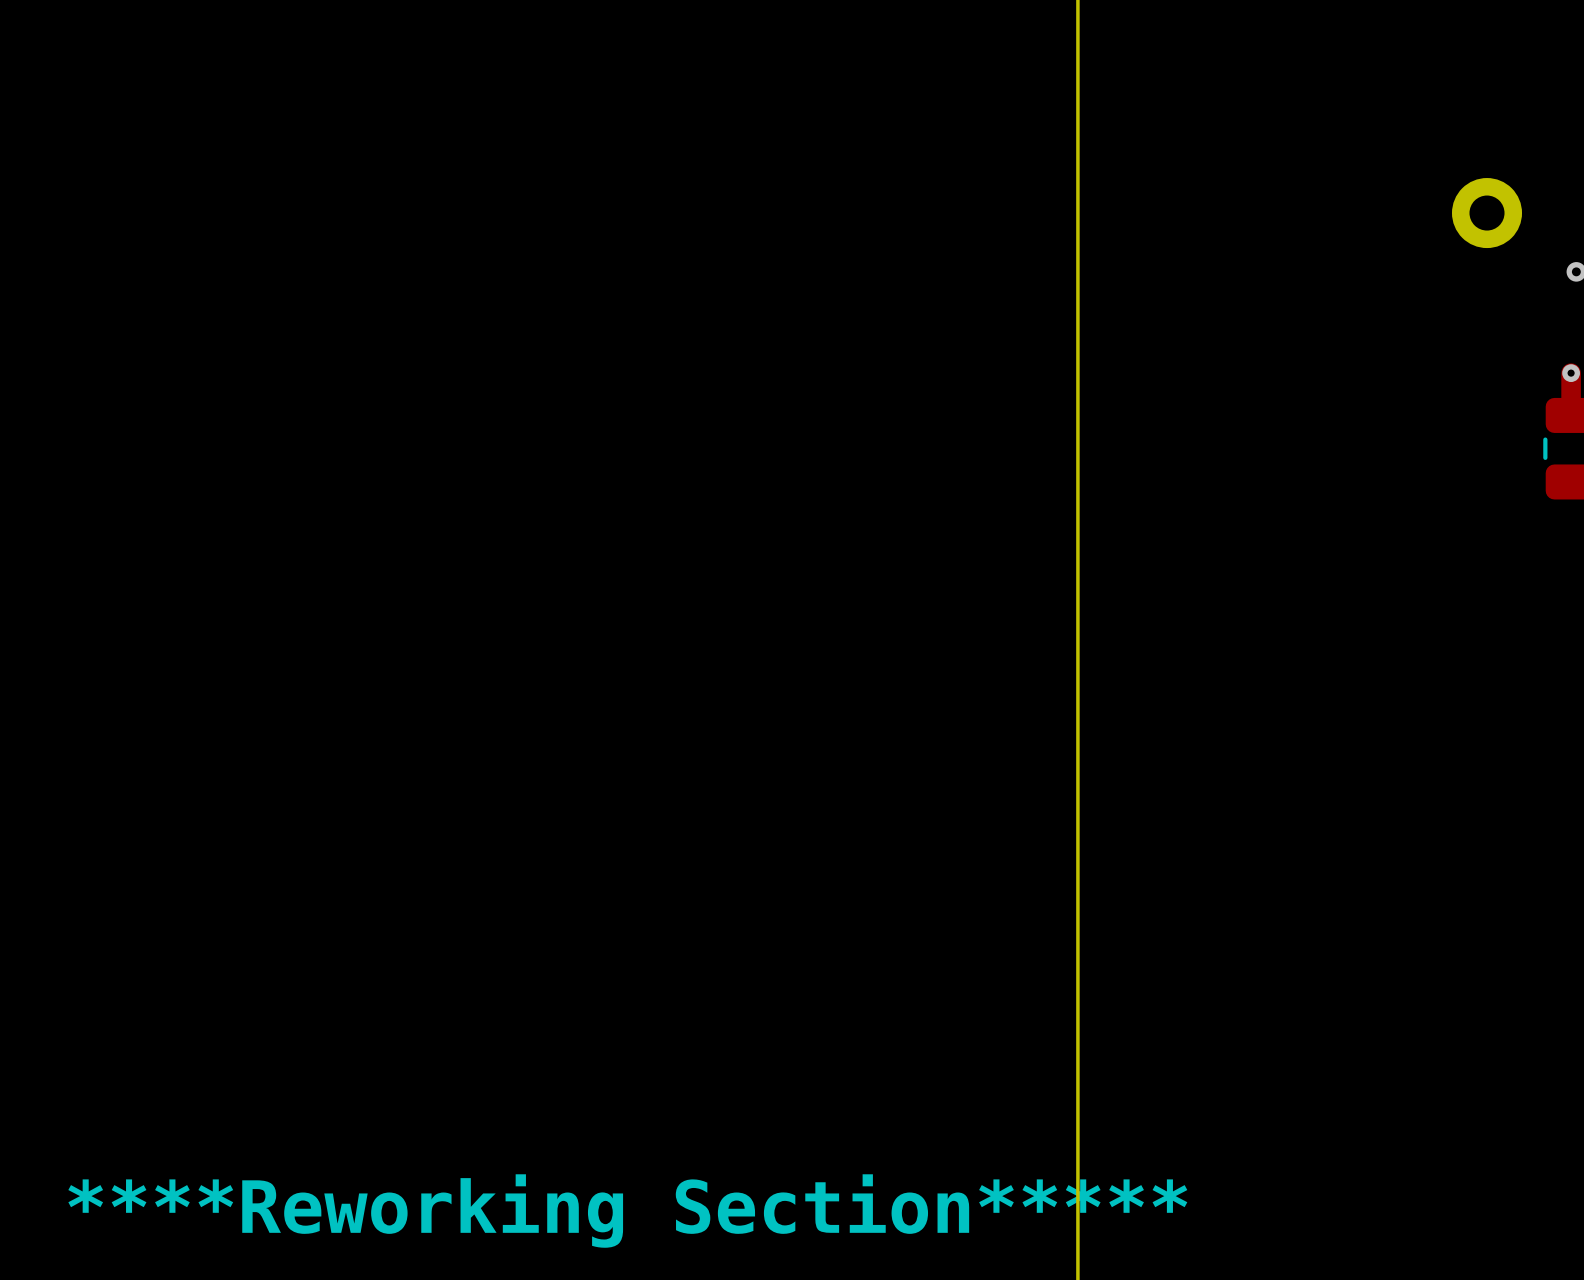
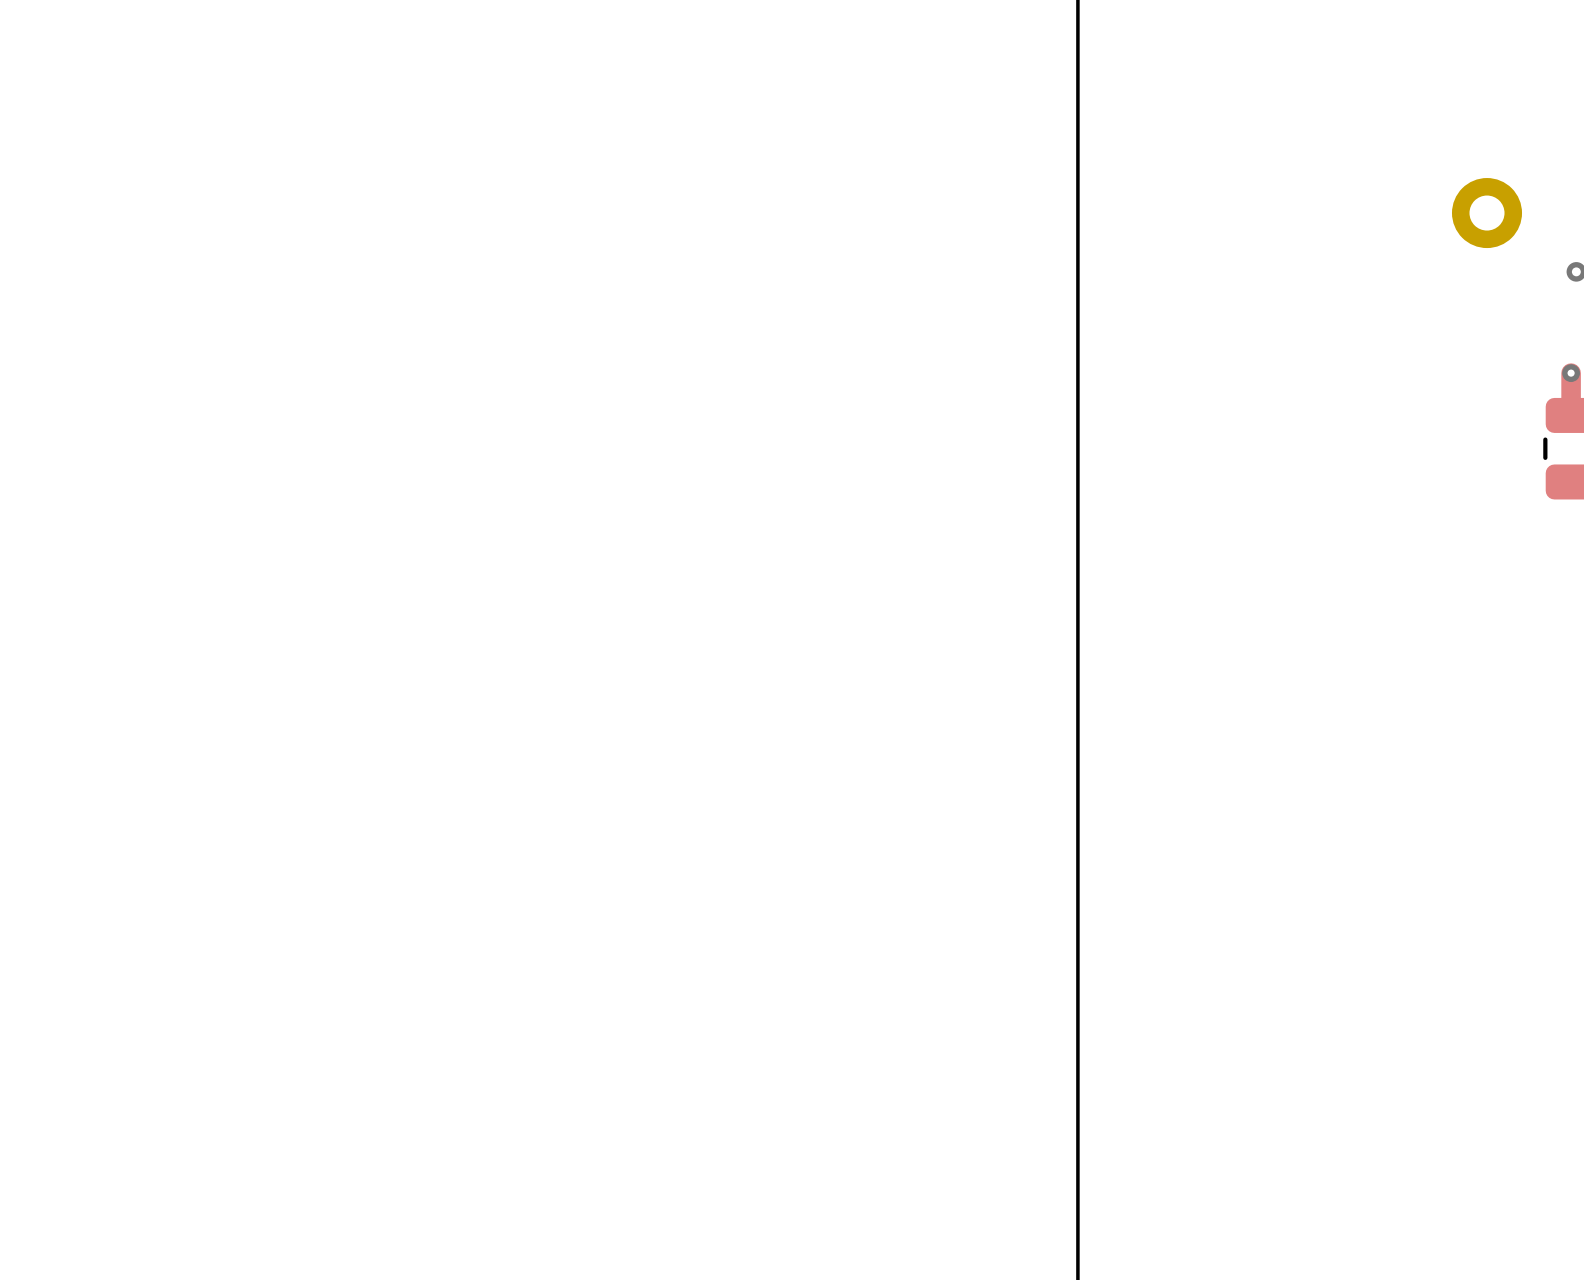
text: ****Reworking Section***** (627, 1211) -> none

